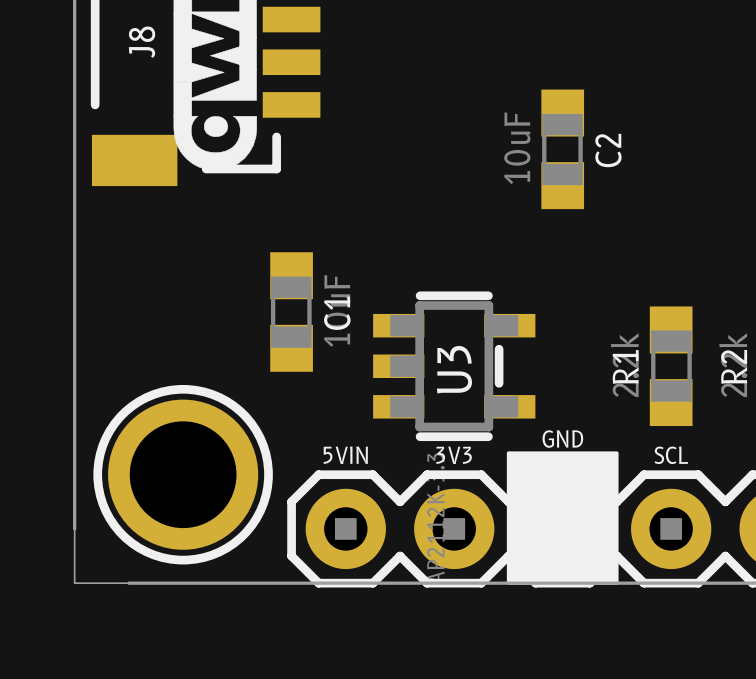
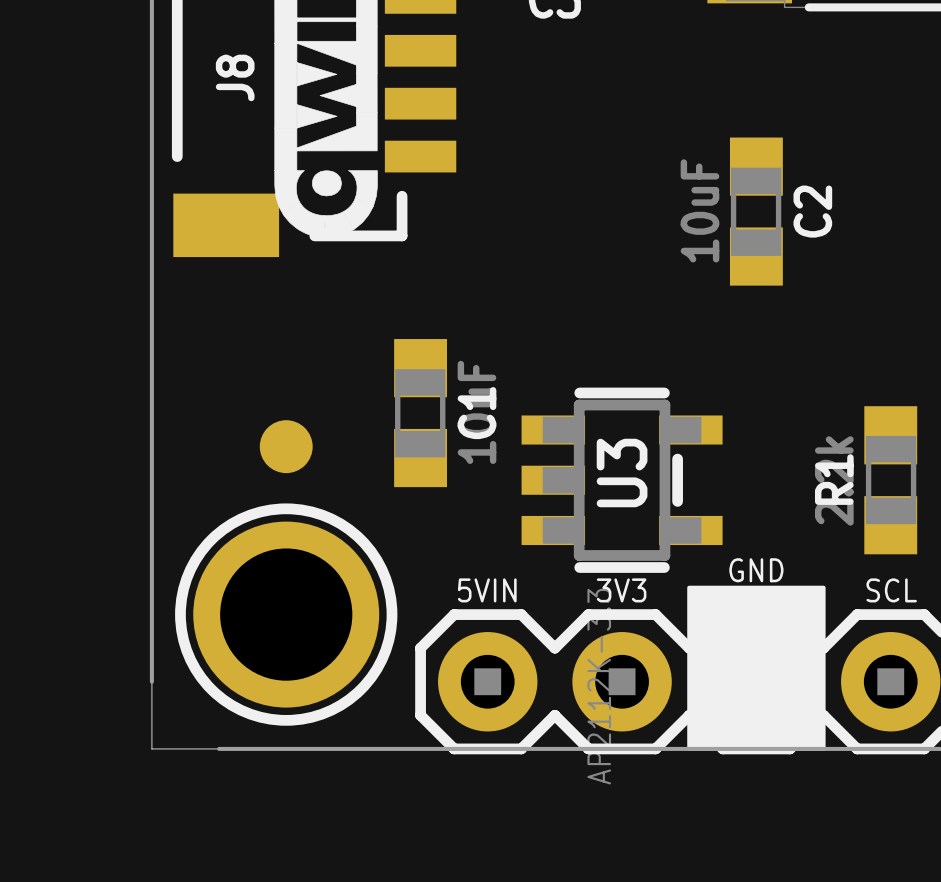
part: none -> (286, 446)

